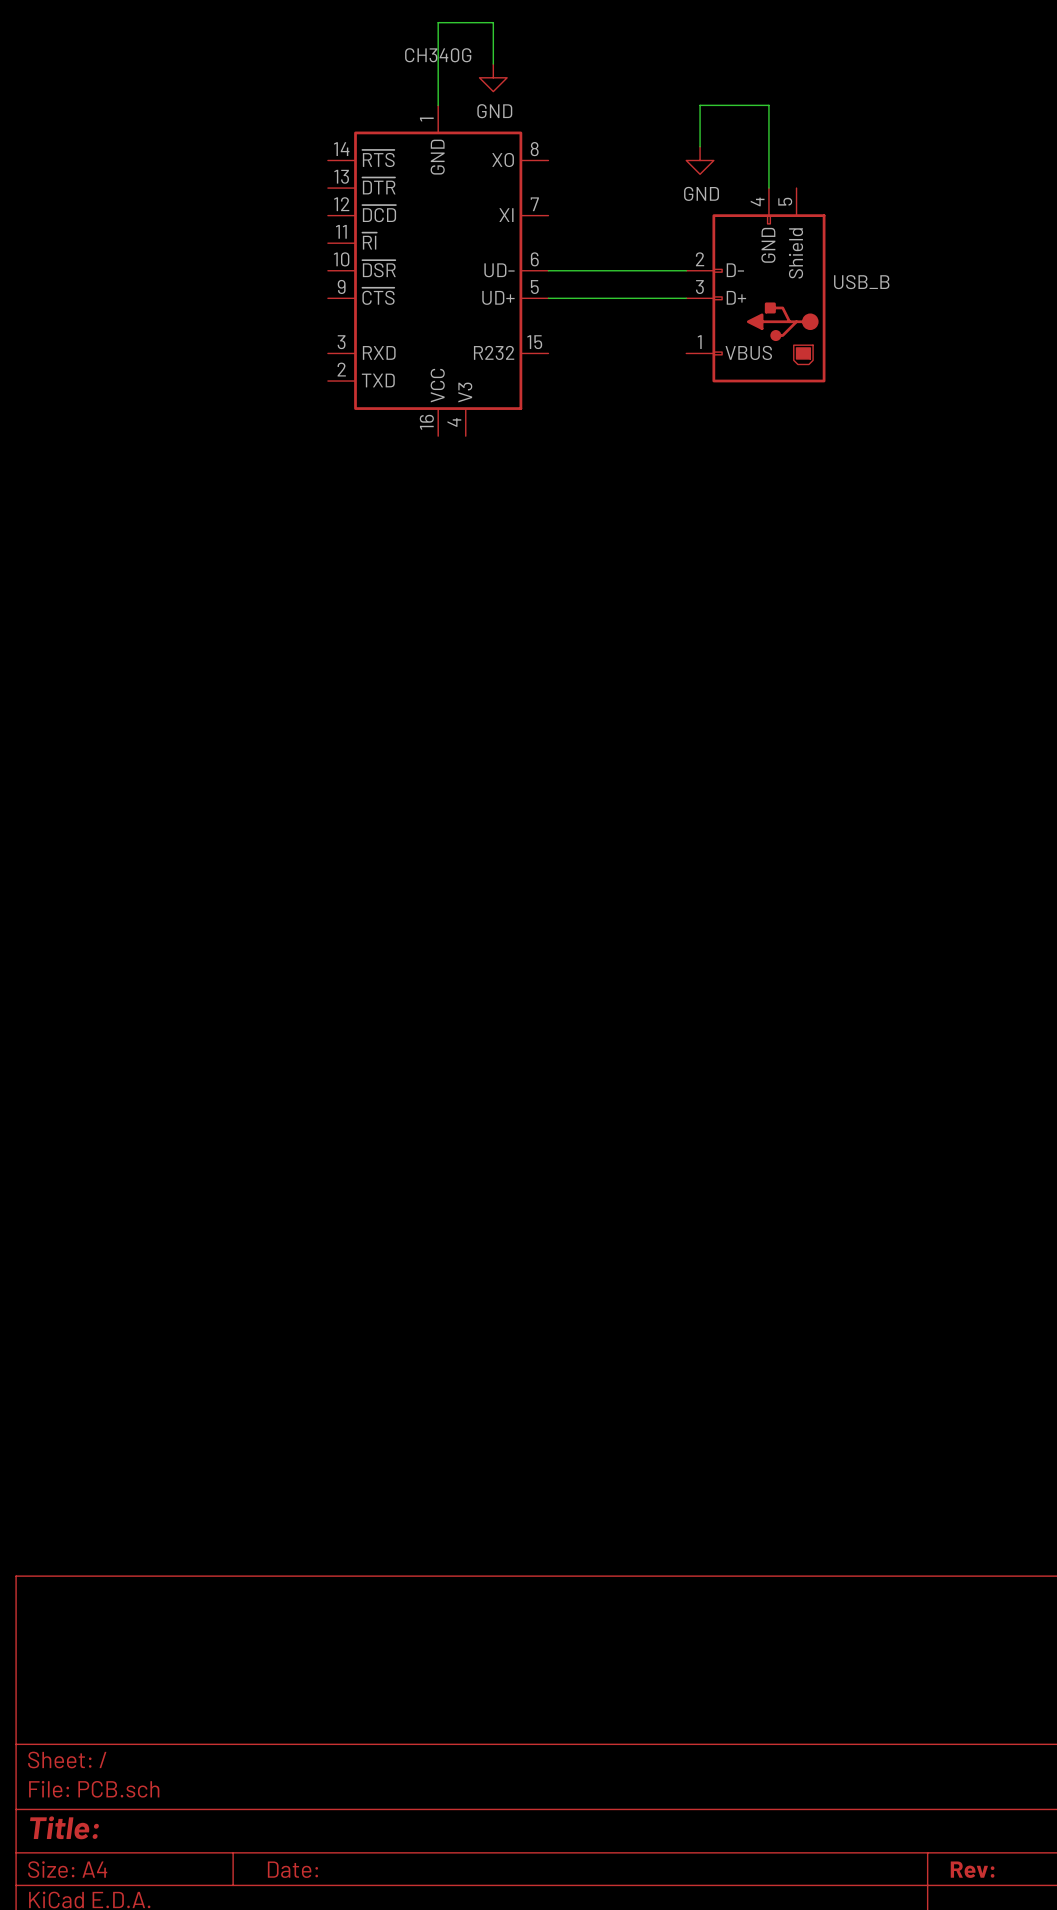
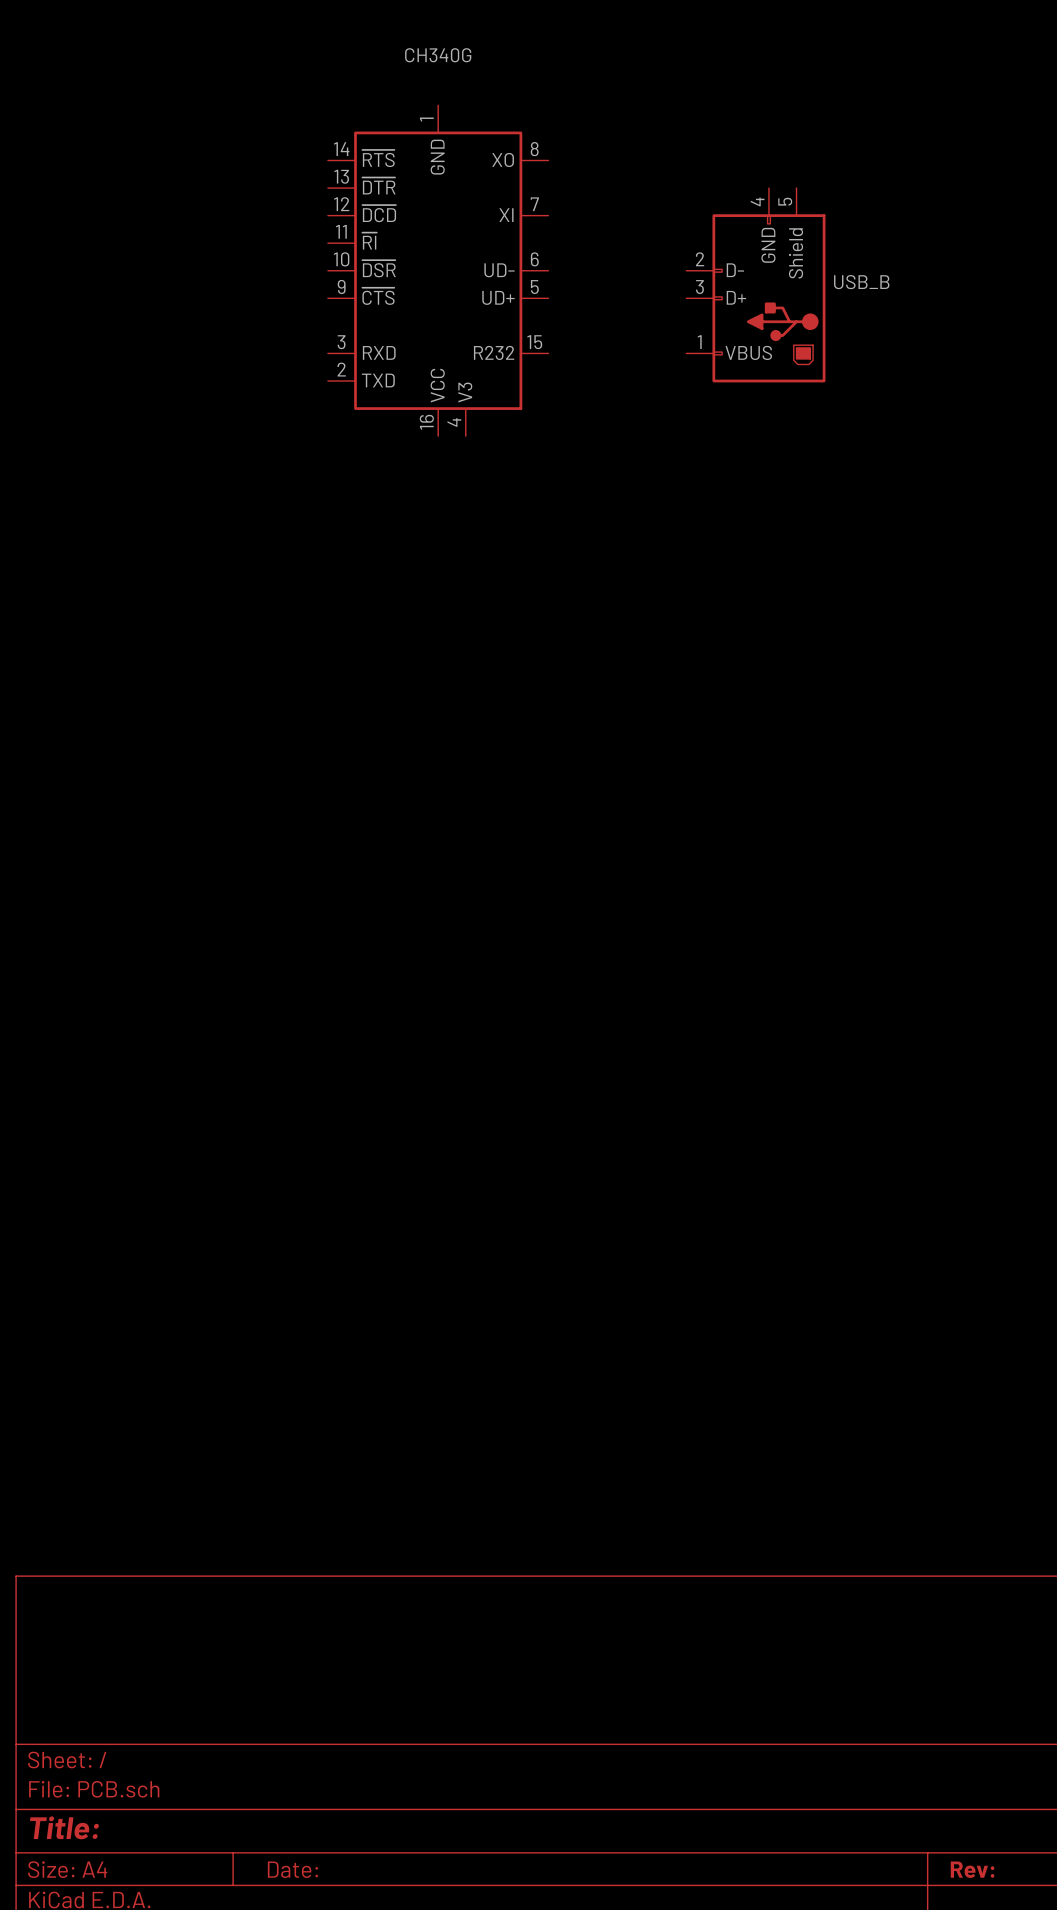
wire: (493, 64) (493, 22) (438, 22) (438, 105) -> none
power symbol: GND (493, 77) -> none
wire: (700, 146) (700, 105) (768, 105) (768, 188) -> none
power symbol: GND (700, 160) -> none
wire: (548, 270) (686, 270) -> none
wire: (548, 298) (686, 298) -> none

